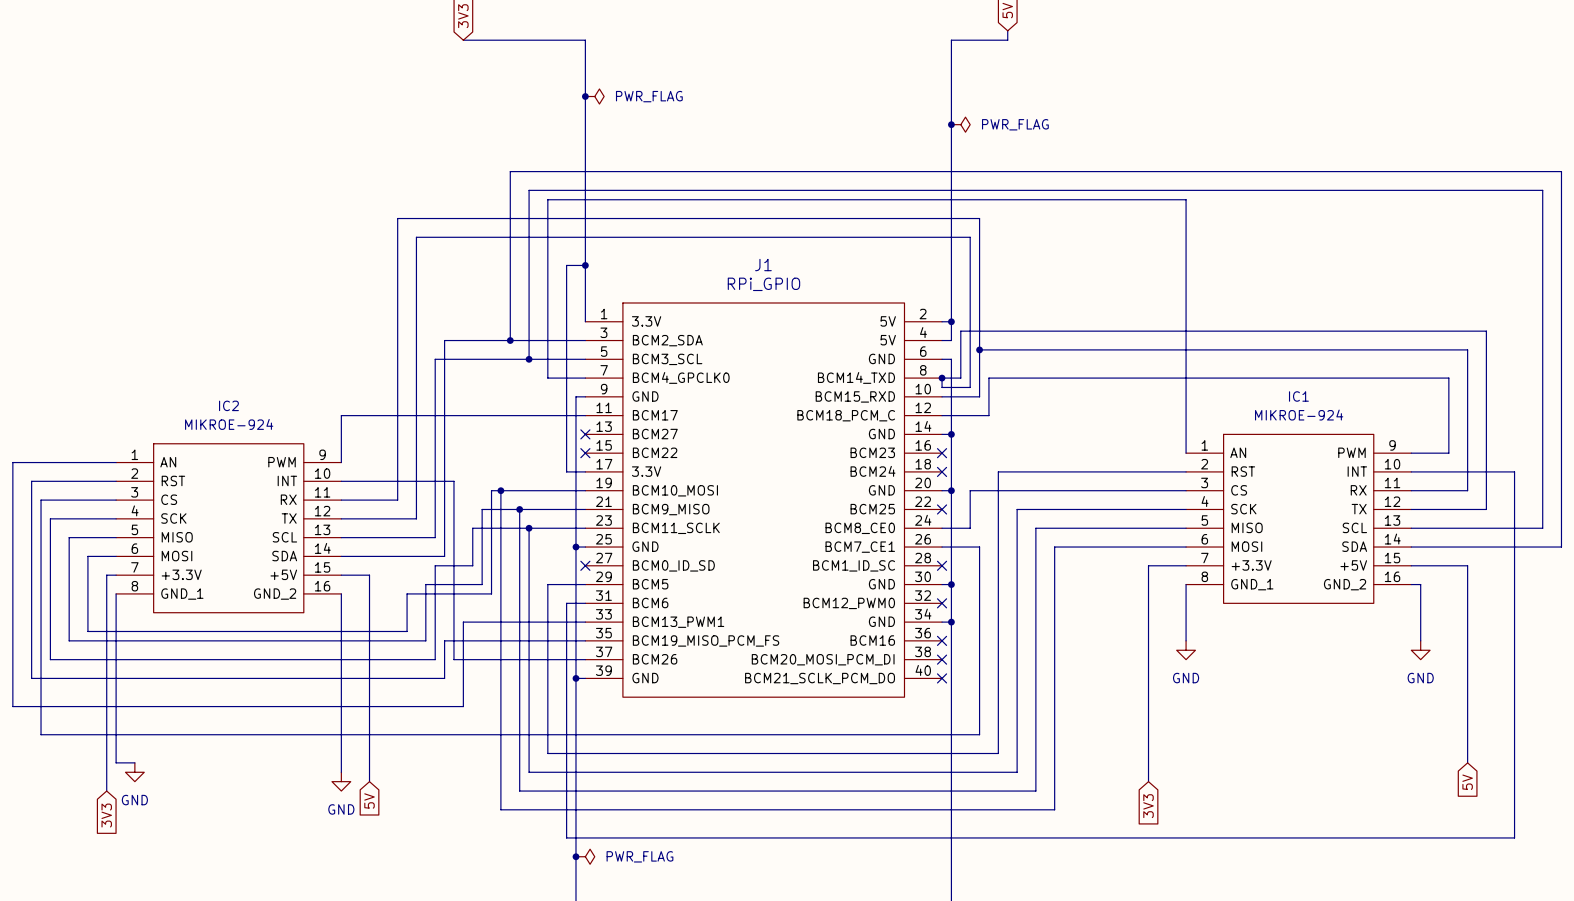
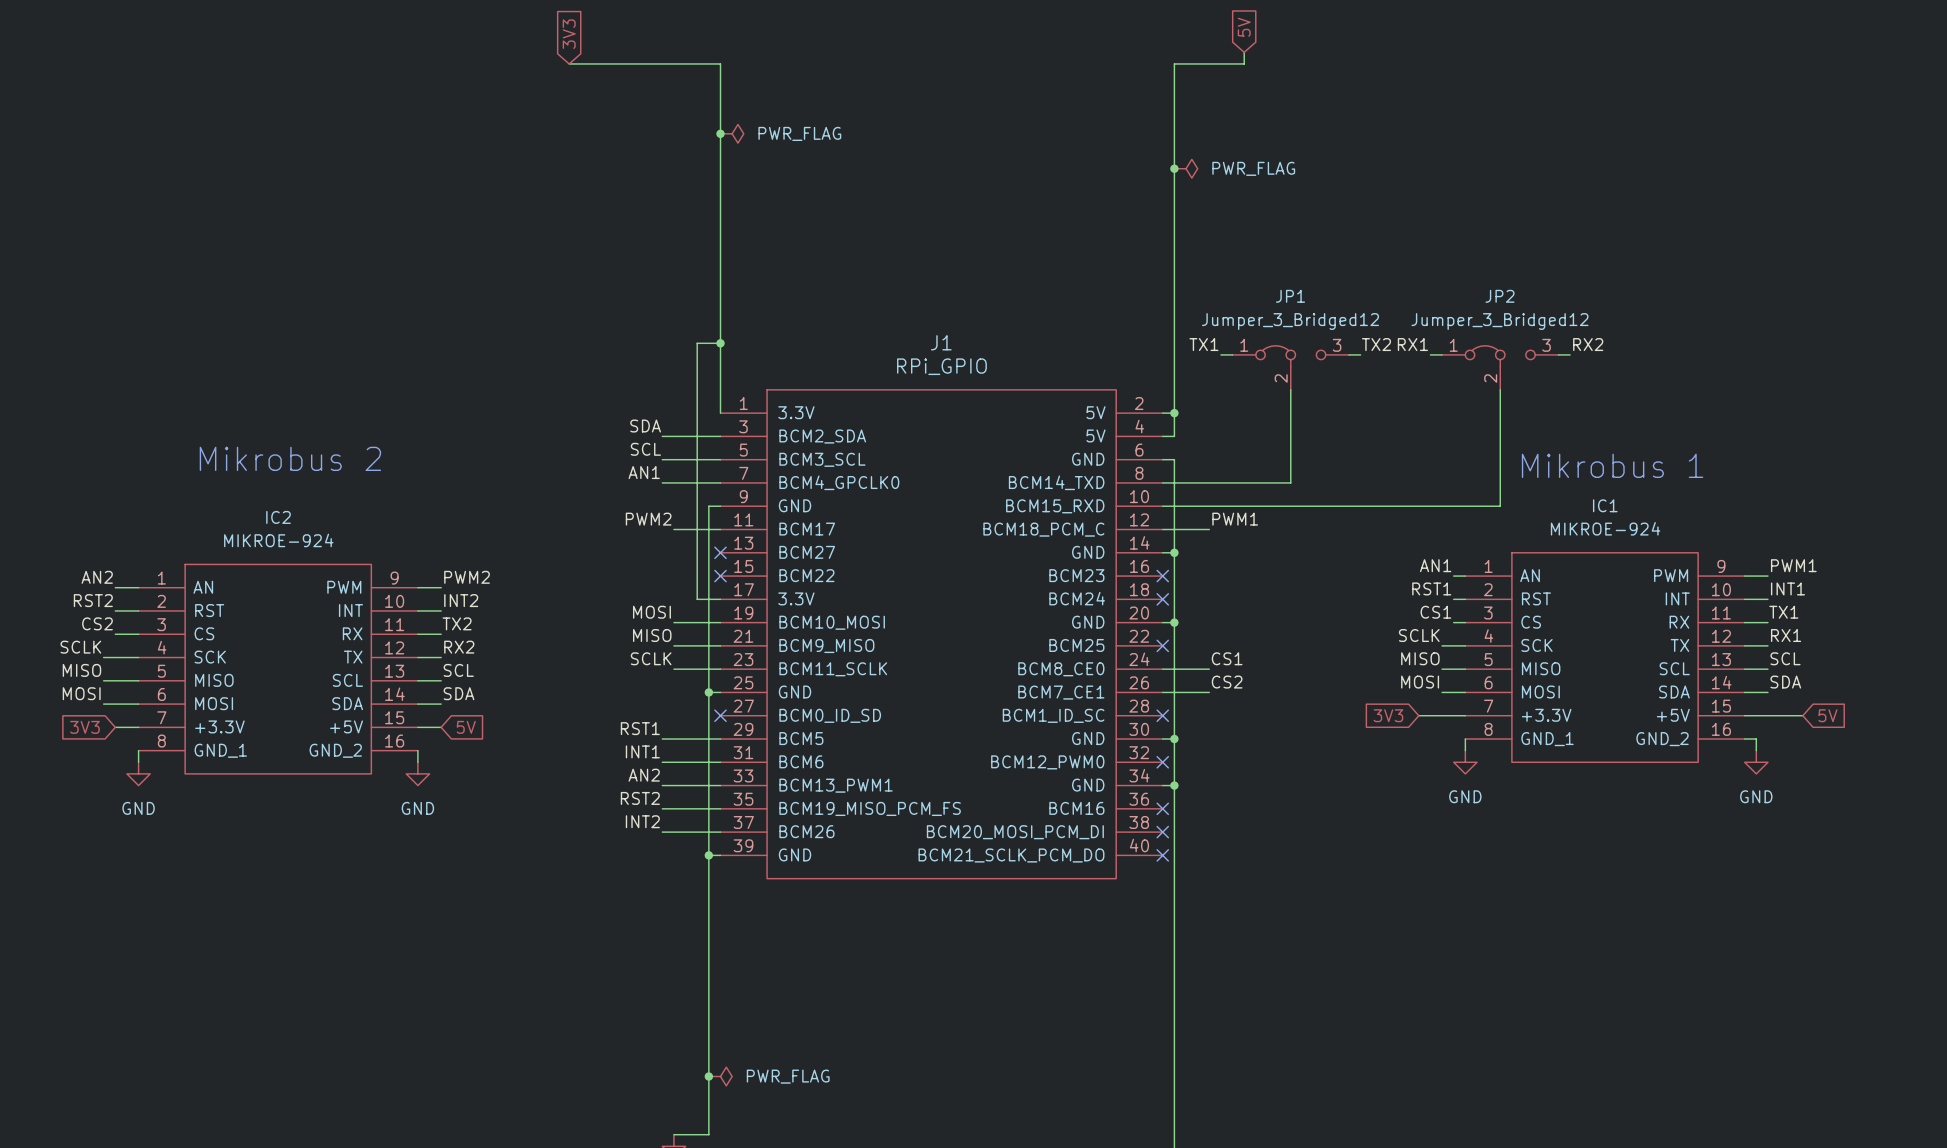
label: none -> TX1 (1203, 344)
label: none -> TX2 (1376, 344)
label: none -> RX1 (1412, 344)
label: none -> RX2 (1588, 344)
wire: none -> (1220, 354) (1232, 354)
wire: none -> (1348, 354) (1360, 354)
wire: none -> (1430, 354) (1442, 354)
wire: none -> (1558, 354) (1570, 354)
JP1: none -> Jumper_3_Bridged12 (1290, 367)
JP2: none -> Jumper_3_Bridged12 (1500, 367)
label: none -> SDA (645, 426)
wire: (510, 340) (510, 171) (1561, 171) (1561, 547) (1430, 547) -> none
junction: (510, 340) -> none
wire: (538, 340) (444, 340) (444, 556) (360, 556) -> none
wire: (979, 349) (1467, 349) (1467, 490) (1430, 490) -> none
junction: (979, 349) -> none
label: none -> SCL (645, 449)
text: none -> Mikrobus 2 (290, 458)
wire: (529, 359) (529, 190) (1542, 190) (1542, 528) (1430, 528) -> none
junction: (529, 359) -> none
wire: (538, 359) (435, 359) (435, 537) (360, 537) -> none
text: none -> Mikrobus 1 (1612, 465)
label: none -> AN1 (644, 472)
wire: none -> (662, 482) (673, 482)
wire: (547, 378) (547, 199) (1186, 199) (1186, 453) -> (1453, 576) (1465, 576)
wire: (942, 378) (942, 387) (970, 387) (970, 237) (416, 237) (416, 518) (360, 518) -> none
junction: (942, 378) -> none
wire: (960, 378) (960, 331) (1486, 331) (1486, 509) (1430, 509) -> none
wire: (988, 378) (988, 415) (979, 415) -> (1220, 482) (1186, 482)
wire: (1045, 378) (1448, 378) (1448, 453) (1430, 453) -> (1290, 482) (1290, 389)
wire: (979, 396) (979, 218) (397, 218) (397, 500) (360, 500) -> (1209, 506) (1500, 506) (1500, 389)
label: none -> PWM2 (648, 519)
label: none -> PWM1 (1235, 519)
wire: (547, 415) (341, 415) (341, 462) -> (441, 587) (417, 587)
label: none -> AN1 (1435, 565)
label: none -> PWM1 (1793, 565)
label: none -> AN2 (97, 577)
label: none -> PWM2 (467, 577)
wire: (97, 462) (12, 462) (12, 706) (463, 706) (463, 622) (538, 622) -> none
label: none -> RST1 (1431, 588)
label: none -> INT1 (1787, 588)
wire: (1176, 471) (998, 471) (998, 753) (547, 753) (547, 584) -> (662, 739) (673, 739)
wire: (1430, 471) (1514, 471) (1514, 837) (566, 837) (566, 603) -> (662, 762) (697, 762)
label: none -> RST2 (93, 600)
label: none -> INT2 (461, 600)
wire: (97, 481) (31, 481) (31, 678) (444, 678) (444, 640) (538, 640) -> none
wire: (360, 481) (453, 481) (453, 659) (538, 659) -> none
label: none -> MOSI (651, 612)
label: none -> CS1 (1435, 612)
label: none -> TX1 (1783, 612)
wire: (500, 490) (500, 809) (1054, 809) (1054, 547) (1167, 547) -> none
junction: (500, 490) -> none
wire: (547, 490) (491, 490) (491, 593) (407, 593) (407, 631) (87, 631) (87, 556) -> none
wire: (1176, 490) (970, 490) (970, 528) -> (1209, 669) (1197, 669)
label: none -> CS2 (97, 623)
label: none -> TX2 (457, 623)
wire: (97, 500) (41, 500) (41, 734) (979, 734) (979, 547) -> none
label: none -> MISO (652, 635)
label: none -> SCLK (1419, 635)
label: none -> RX1 (1786, 635)
wire: (519, 509) (519, 791) (1035, 791) (1035, 528) (1167, 528) -> none
junction: (519, 509) -> none
wire: (547, 509) (482, 509) (482, 584) (425, 584) (425, 640) (69, 640) (69, 537) (87, 537) -> none
wire: (1167, 509) (1017, 509) (1017, 772) (529, 772) (529, 528) -> none
label: none -> SCLK (80, 647)
label: none -> RX2 (459, 647)
wire: (87, 518) (50, 518) (50, 659) (435, 659) (435, 565) (472, 565) (472, 528) (547, 528) -> none
label: none -> SCLK (651, 658)
label: none -> CS1 (1227, 658)
label: none -> MISO (1420, 658)
label: none -> SCL (1785, 658)
junction: (529, 528) -> none
label: none -> MISO (81, 670)
label: none -> SCL (458, 670)
label: none -> CS2 (1227, 682)
label: none -> MOSI (1420, 682)
label: none -> SDA (1785, 682)
label: none -> MOSI (81, 693)
label: none -> SDA (459, 693)
global label: none -> 3V3 (1388, 715)
wire: (1148, 565) (1148, 781) -> none
wire: (1458, 565) (1467, 565) (1467, 762) -> none
global label: none -> 5V (1827, 715)
global label: none -> 3V3 (84, 727)
wire: (106, 575) (106, 791) -> (126, 727) (115, 727)
wire: (360, 575) (369, 575) (369, 781) -> none
global label: none -> 5V (466, 727)
label: none -> RST1 (640, 728)
wire: (1186, 593) (1186, 640) -> none
wire: (1420, 593) (1420, 640) -> none
label: none -> INT1 (642, 751)
wire: (116, 603) (116, 762) (134, 762) -> none
wire: (341, 603) (341, 772) -> none
power symbol: none -> GND (138, 773)
power symbol: none -> GND (417, 773)
label: none -> AN2 (644, 775)
label: none -> RST2 (640, 798)
power symbol position: GND (1186, 650) -> GND (1465, 762)
power symbol position: GND (1420, 650) -> GND (1756, 762)
label: none -> INT2 (642, 821)
power symbol: GND (134, 772) -> none
power symbol: GND (341, 781) -> none
global label: 5V (1467, 782) -> none
global label: 5V (369, 801) -> none
global label: 3V3 (1148, 806) -> none
global label: 3V3 (106, 815) -> none

